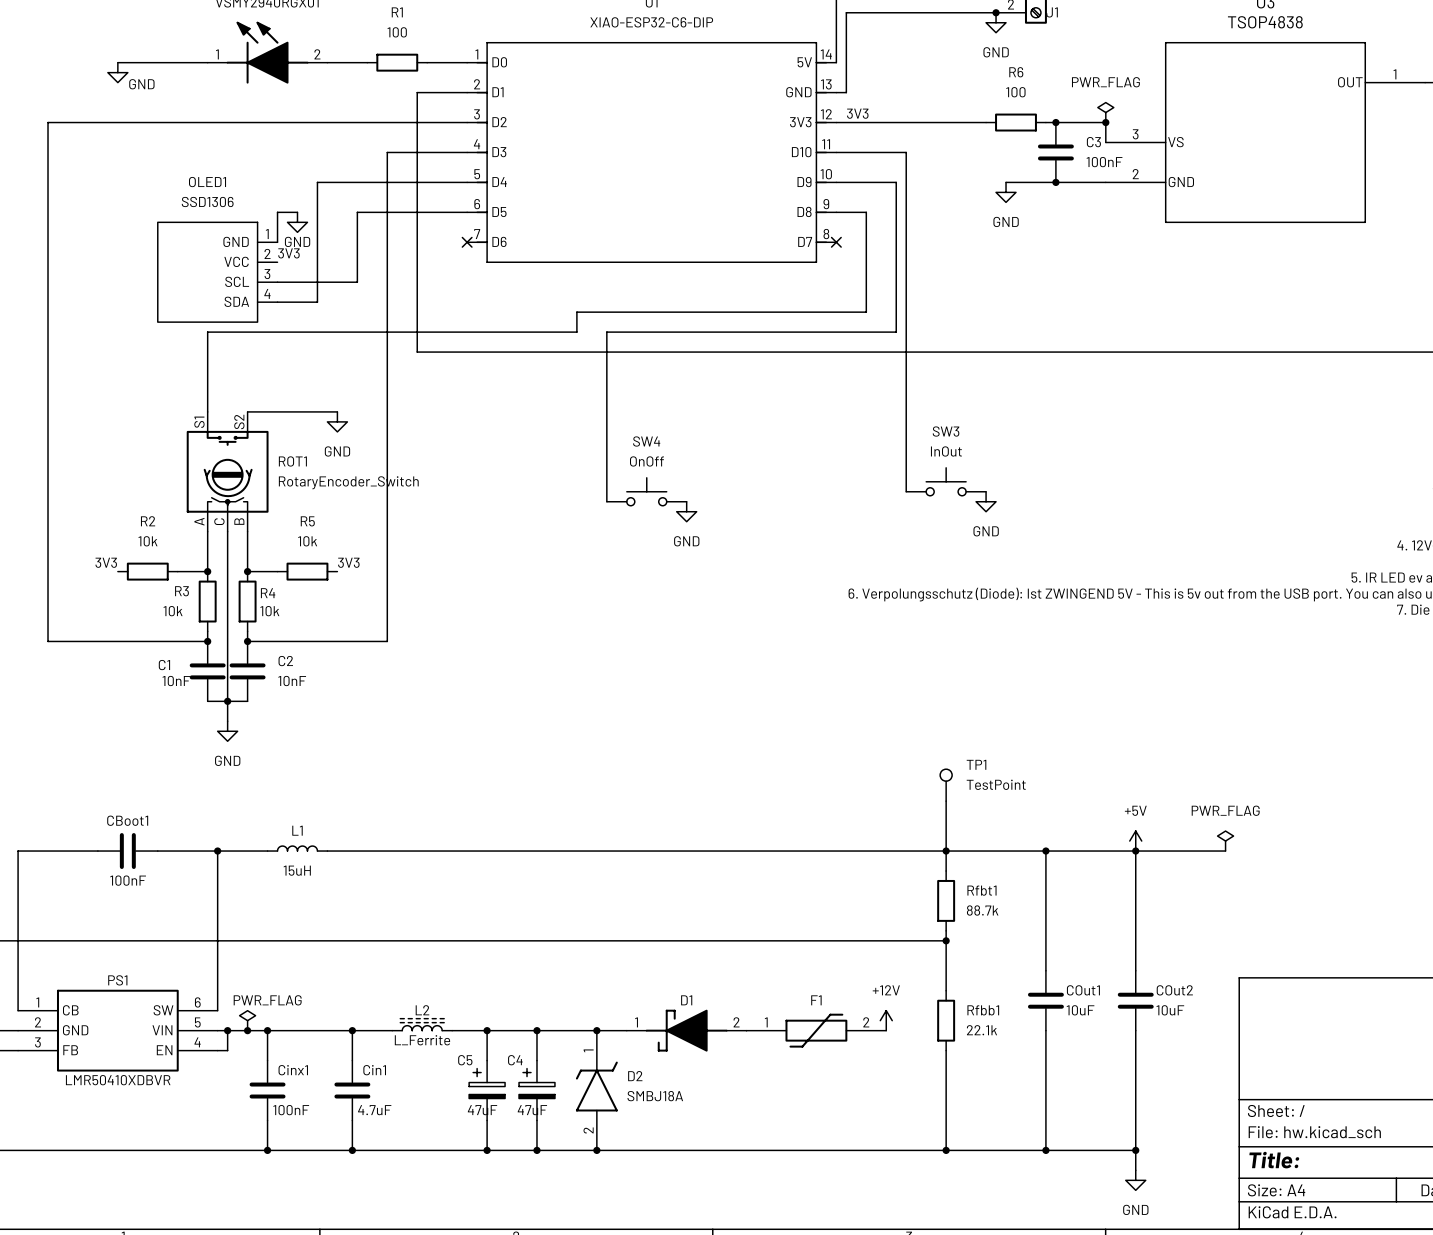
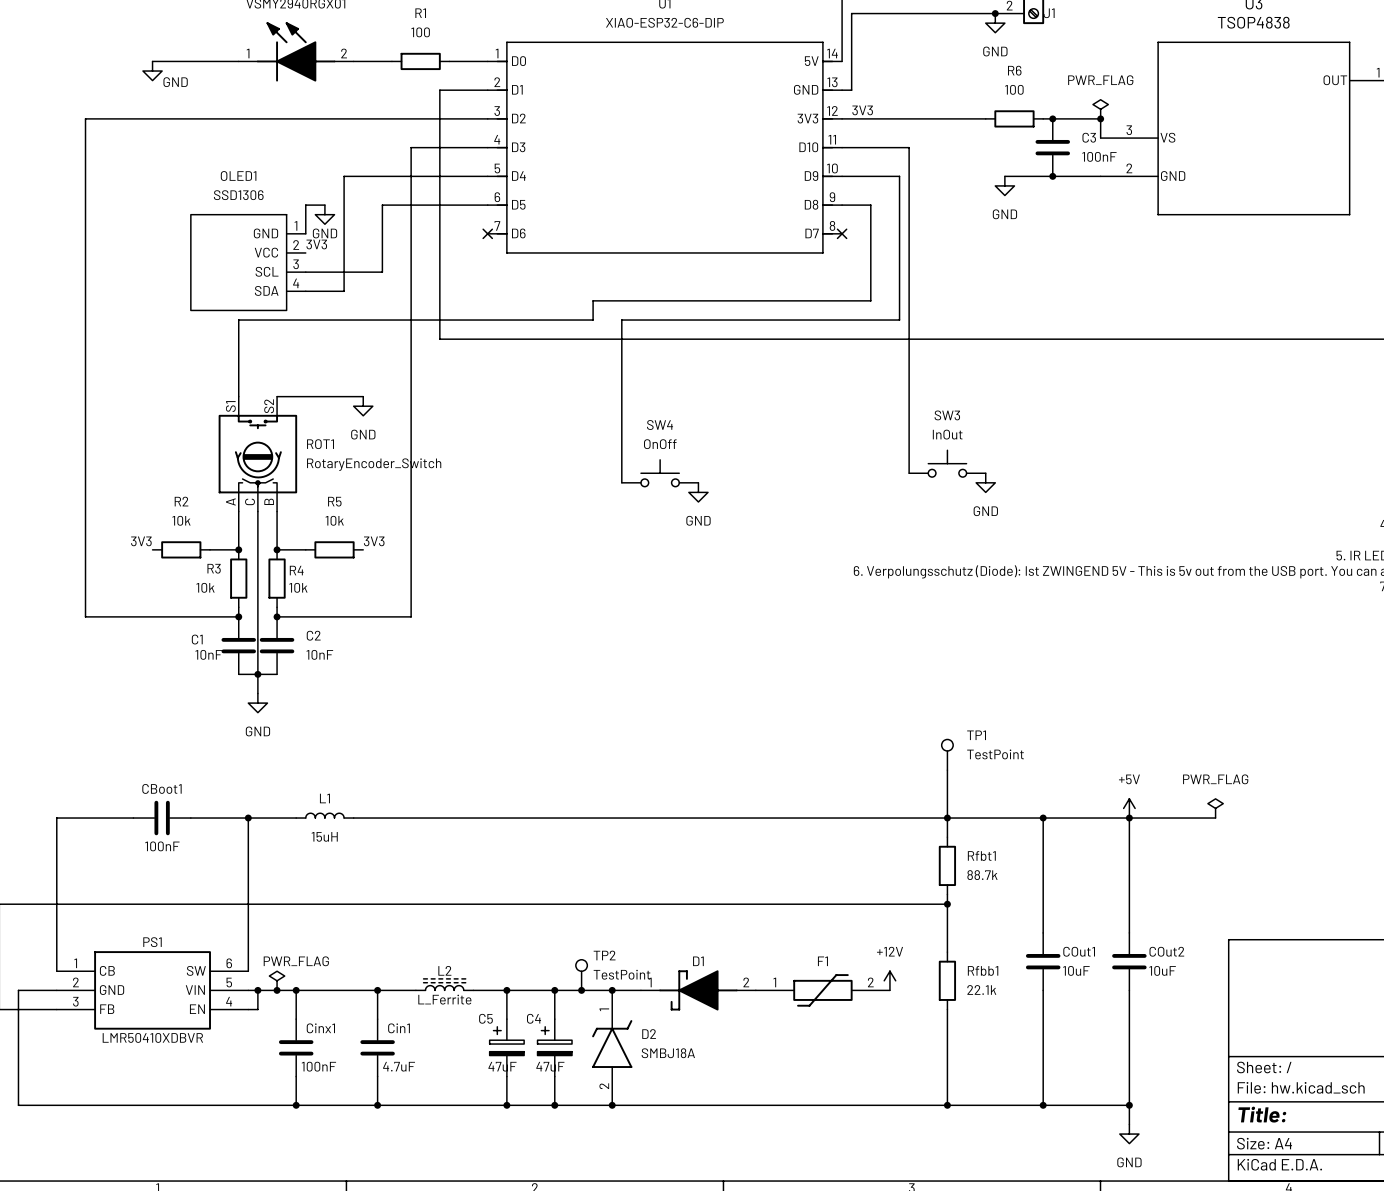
TP2: none -> TestPoint (581, 975)
junction: none -> (581, 990)

